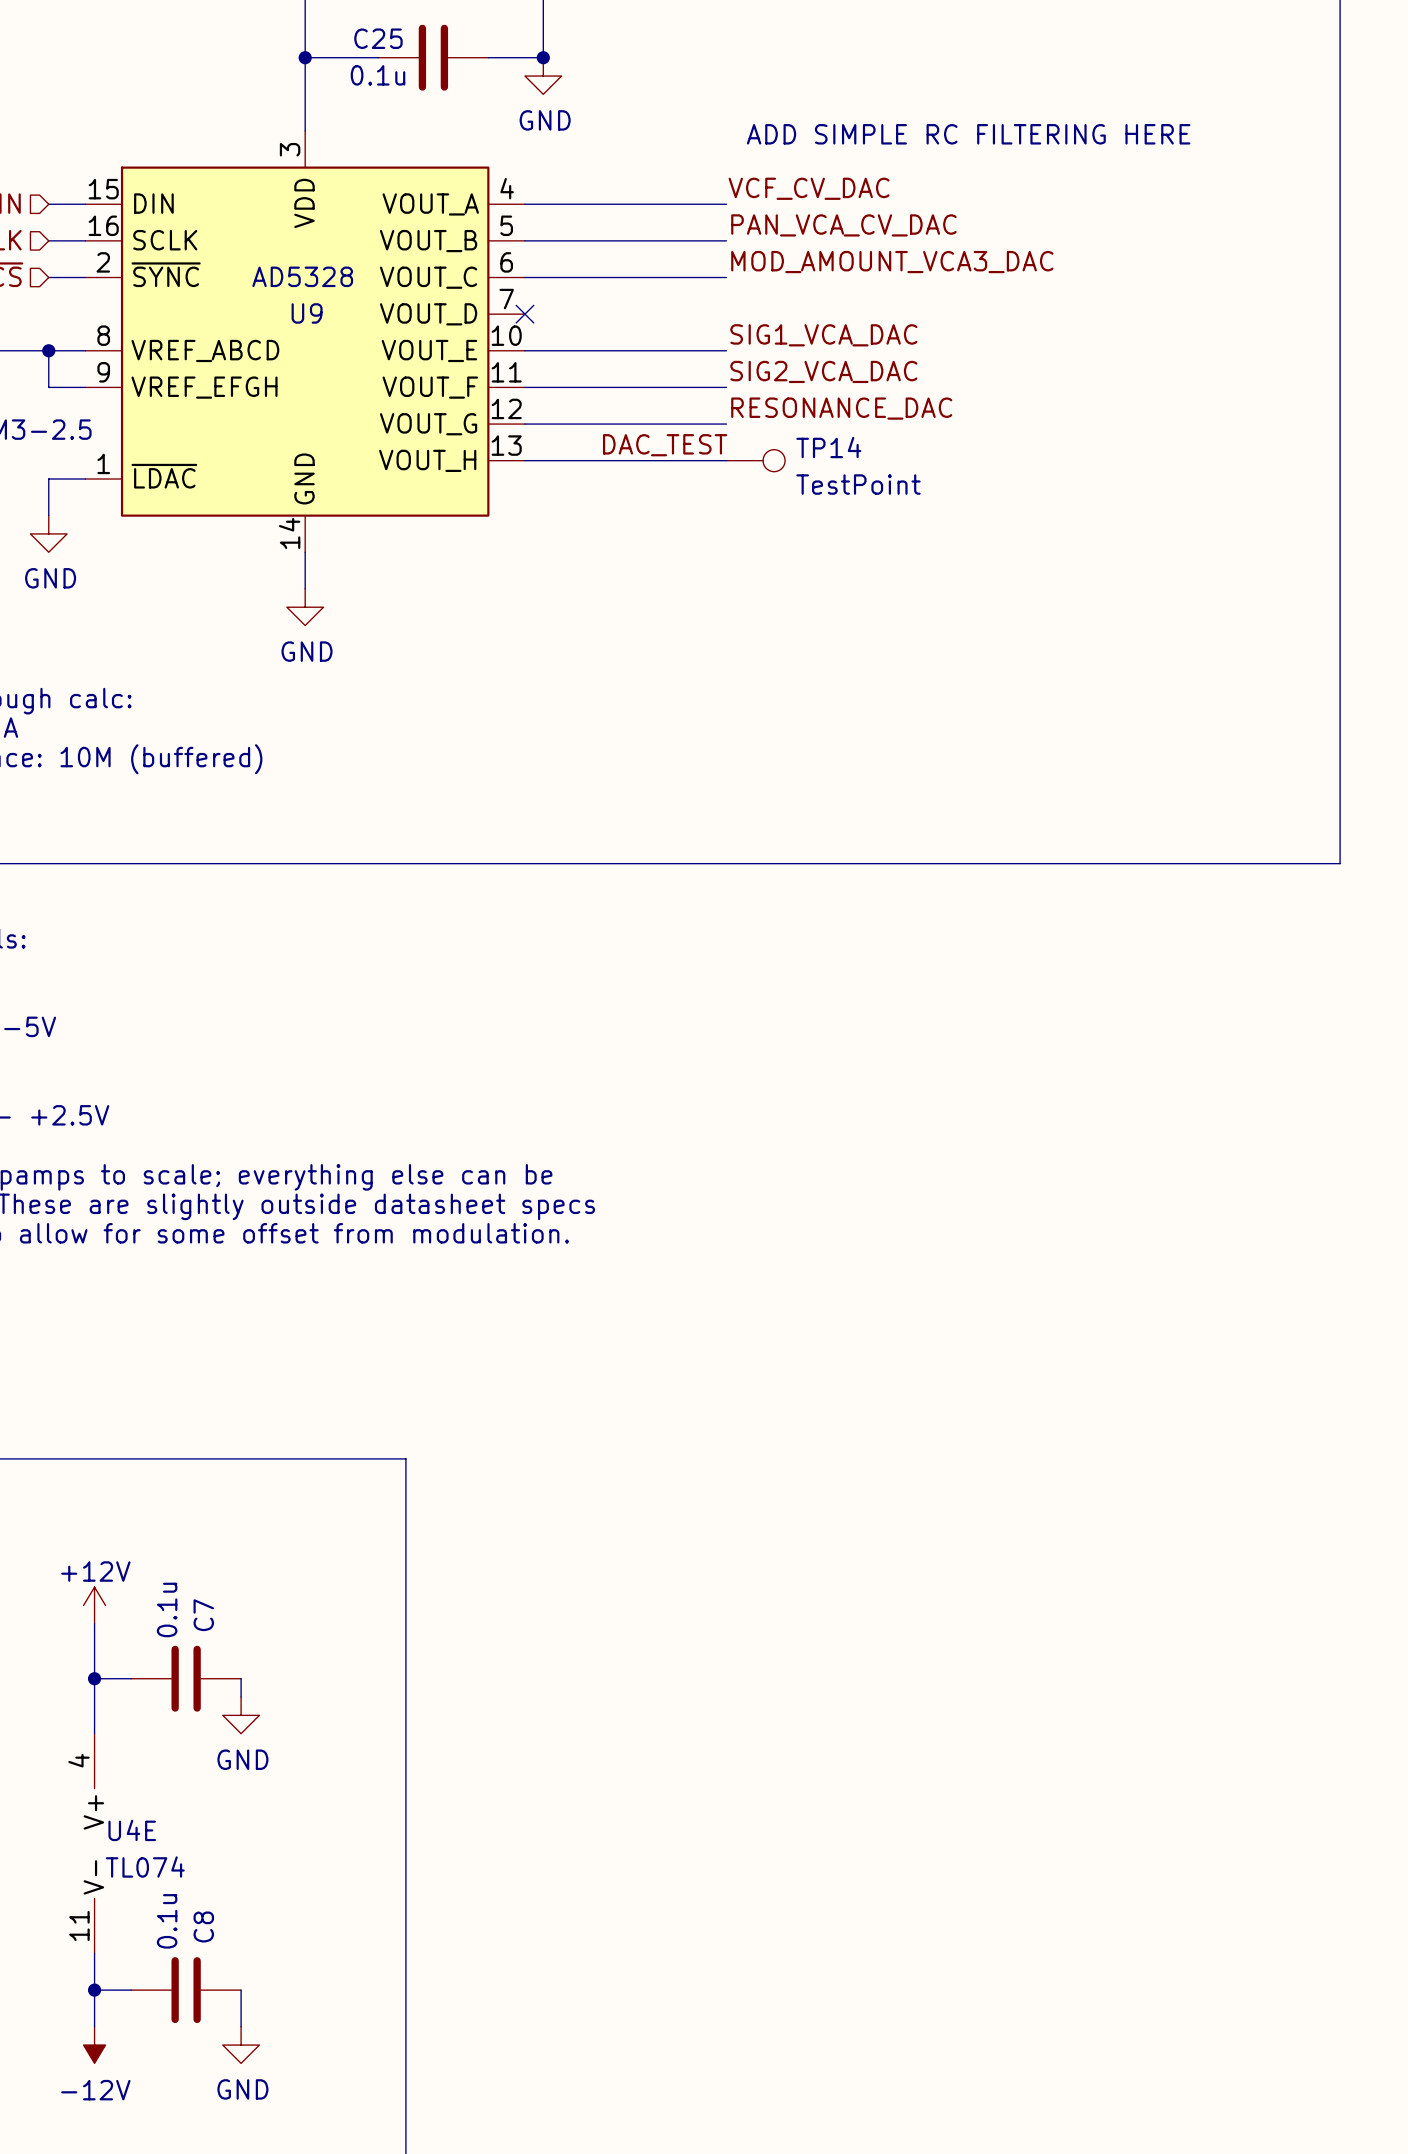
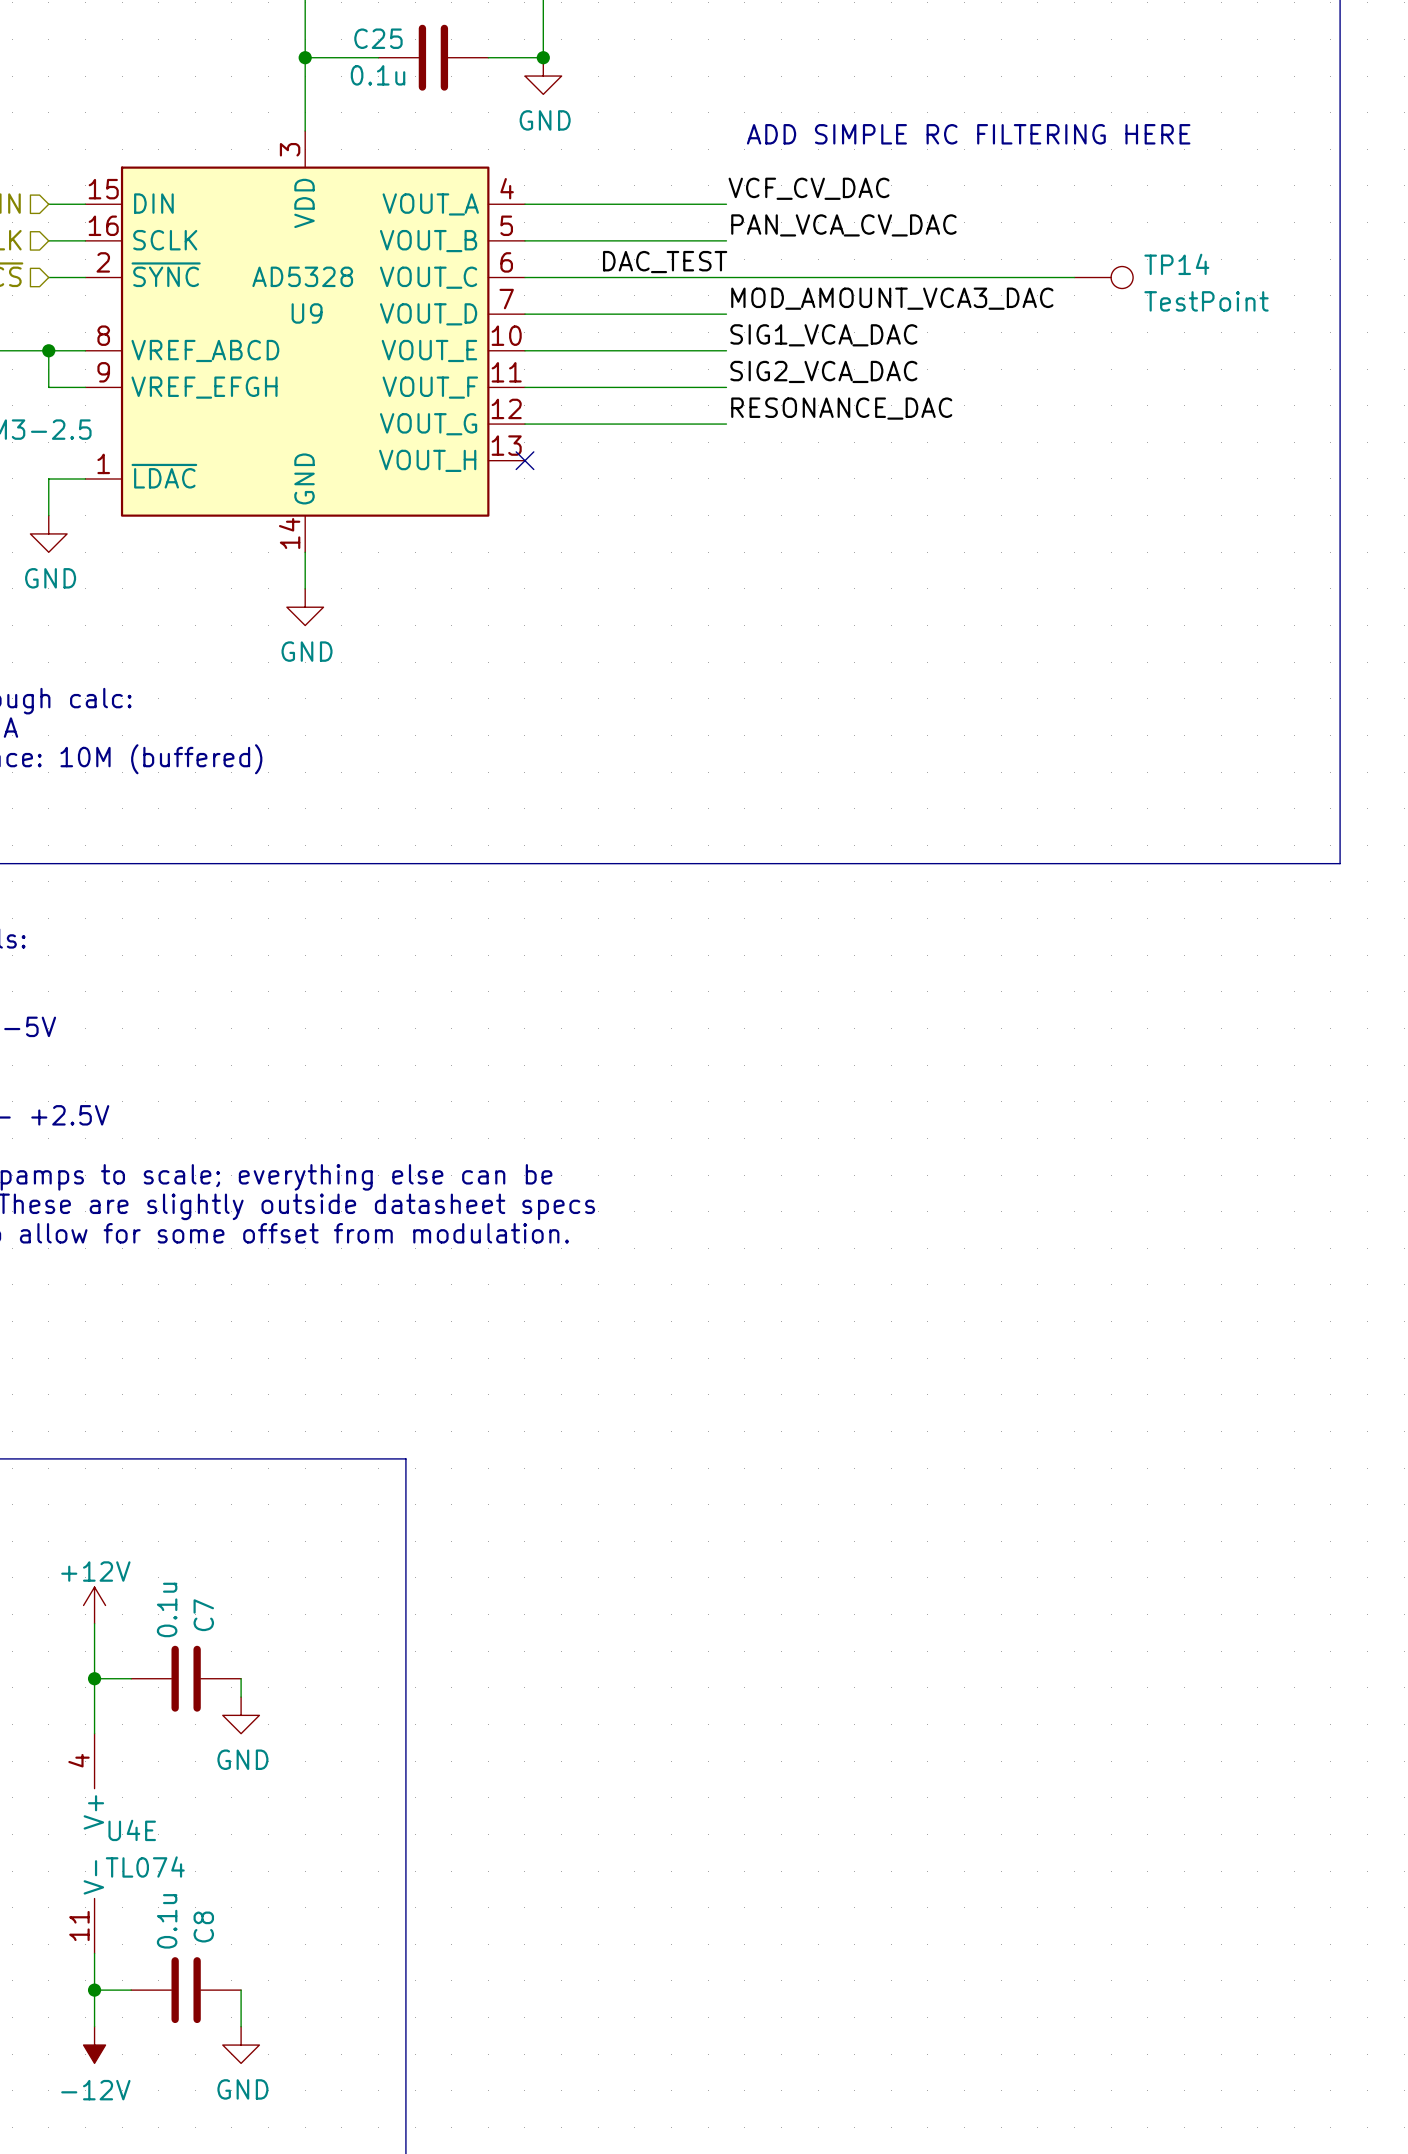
label position: MOD_AMOUNT_VCA3_DAC (892, 262) -> MOD_AMOUNT_VCA3_DAC (892, 298)
wire: none -> (726, 277) (1074, 277)
no-connect mark: (524, 314) -> none
label position: DAC_TEST (665, 445) -> DAC_TEST (665, 262)
wire: (524, 460) (726, 460) -> (524, 314) (726, 314)
no-connect mark: none -> (524, 460)
TP14 position: (755, 460) -> (1103, 277)

